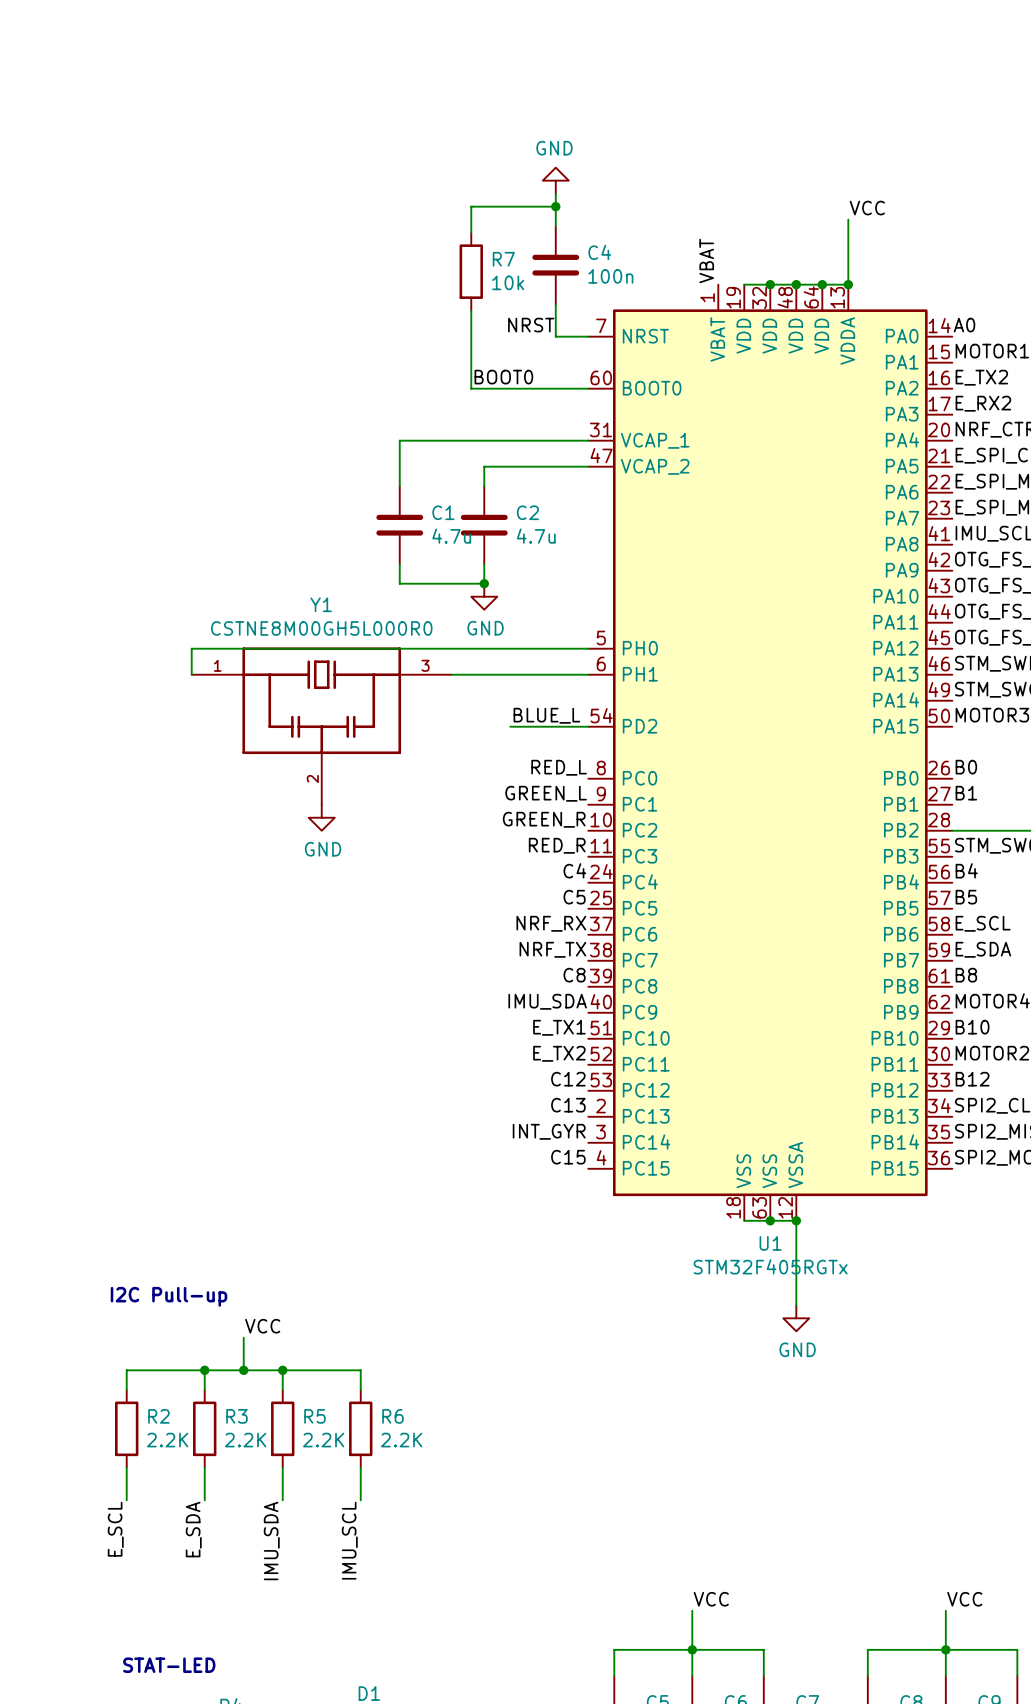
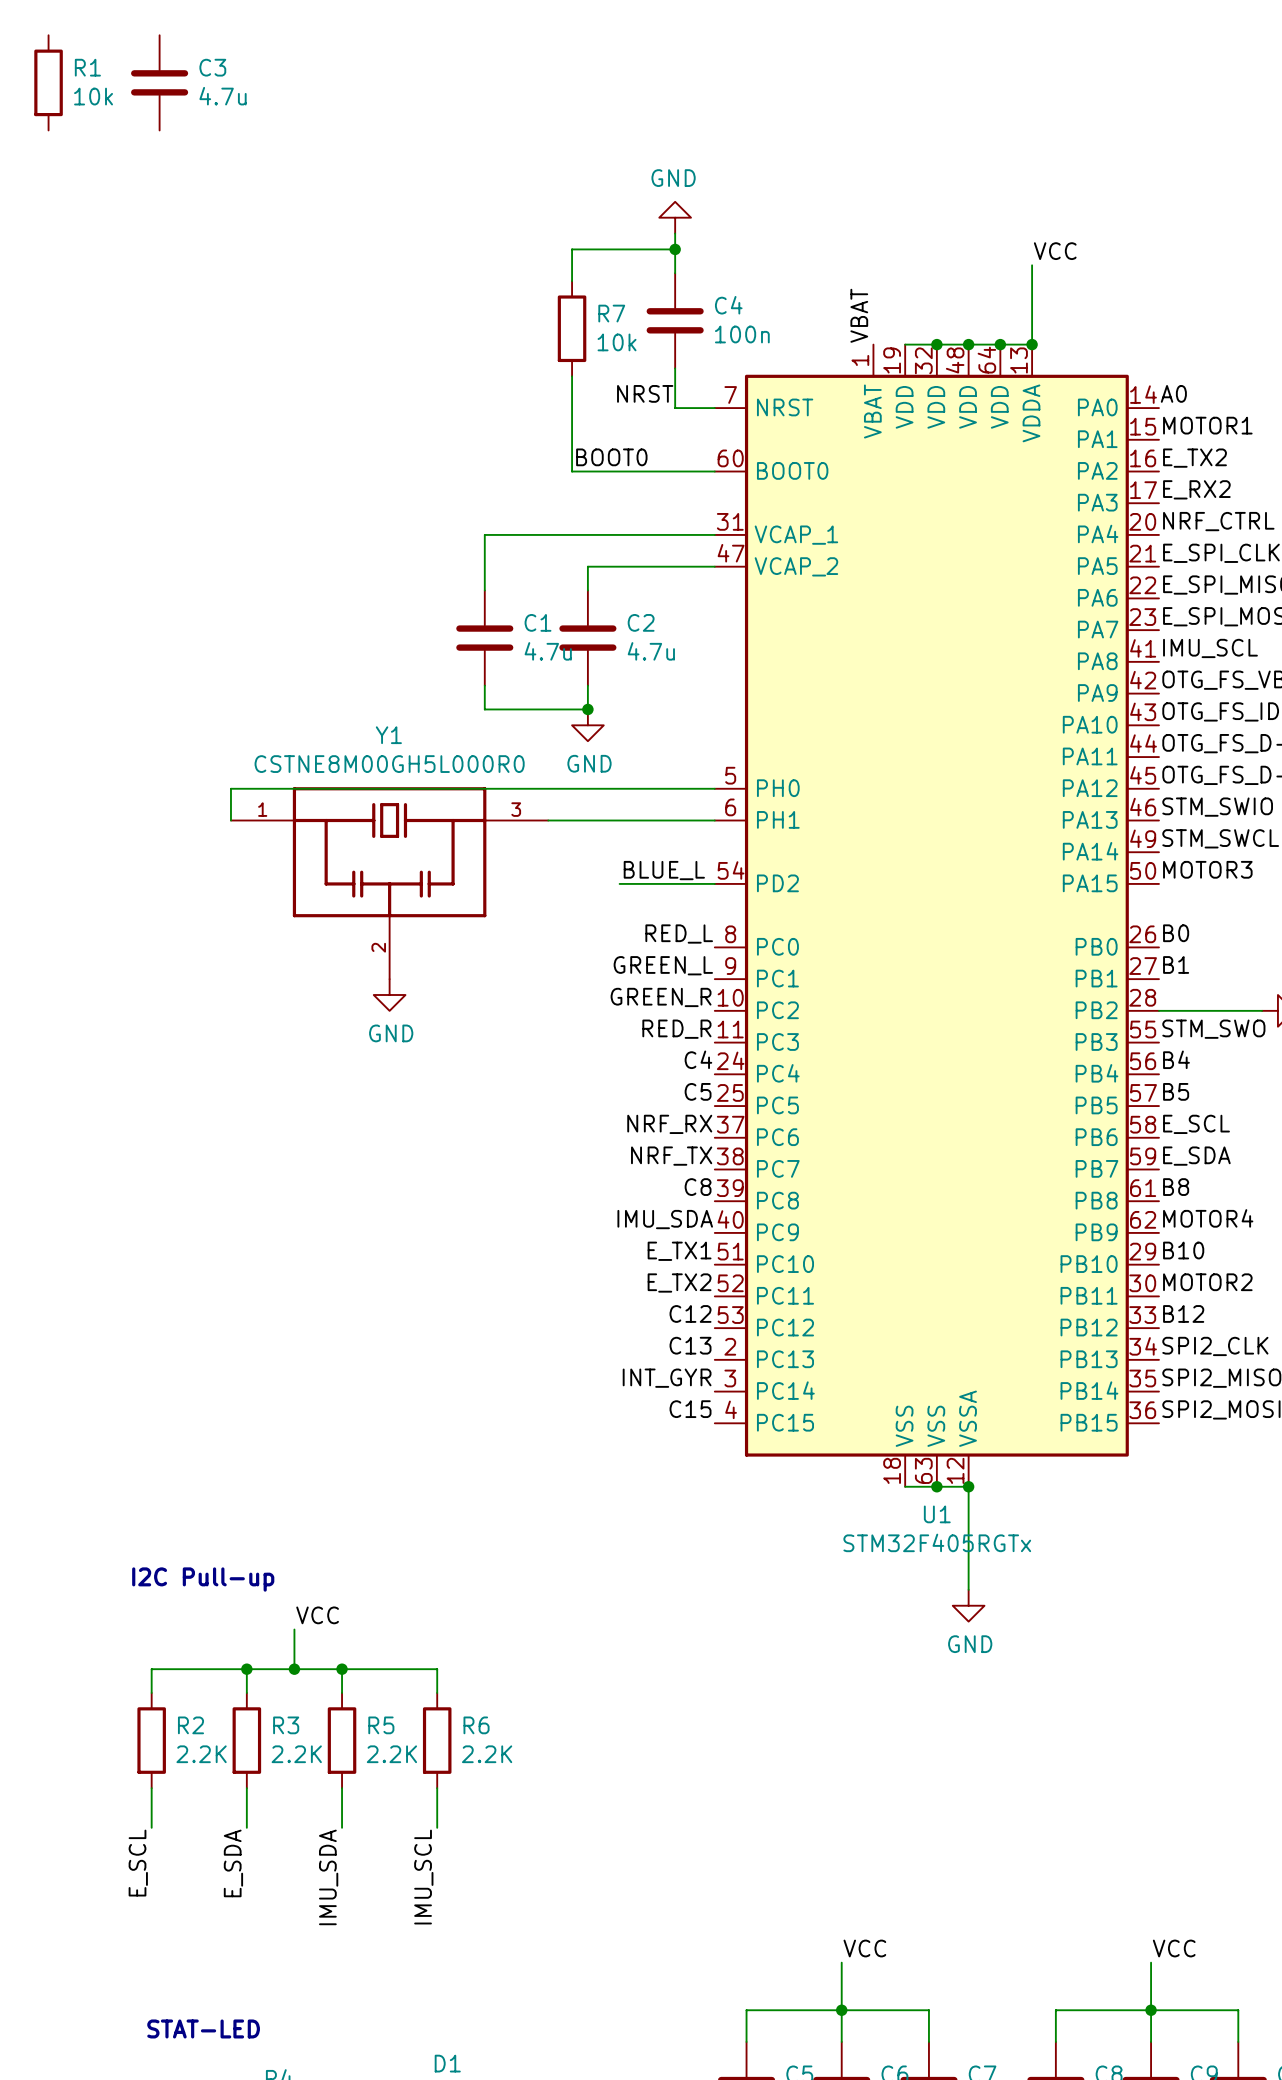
R1: none -> 10k (48, 82)
C3: none -> 4.7u (159, 82)

